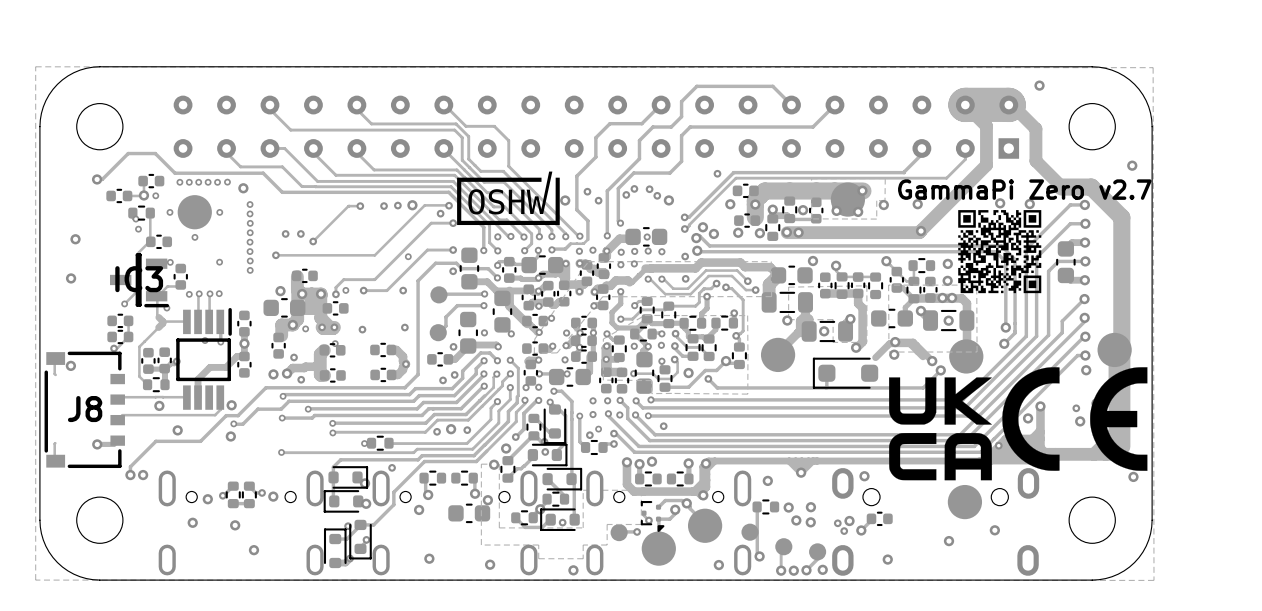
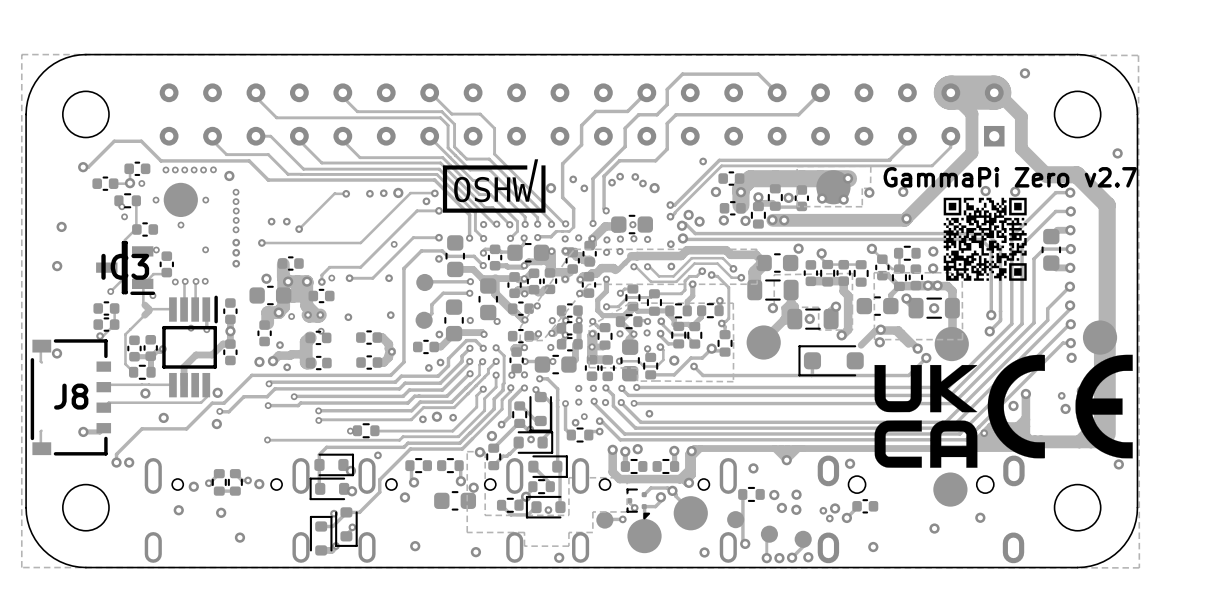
via: (250, 251) -> none
via: none -> (236, 242)
via: (250, 260) -> none
via: none -> (236, 252)
via: (250, 270) -> none
via: none -> (236, 263)

